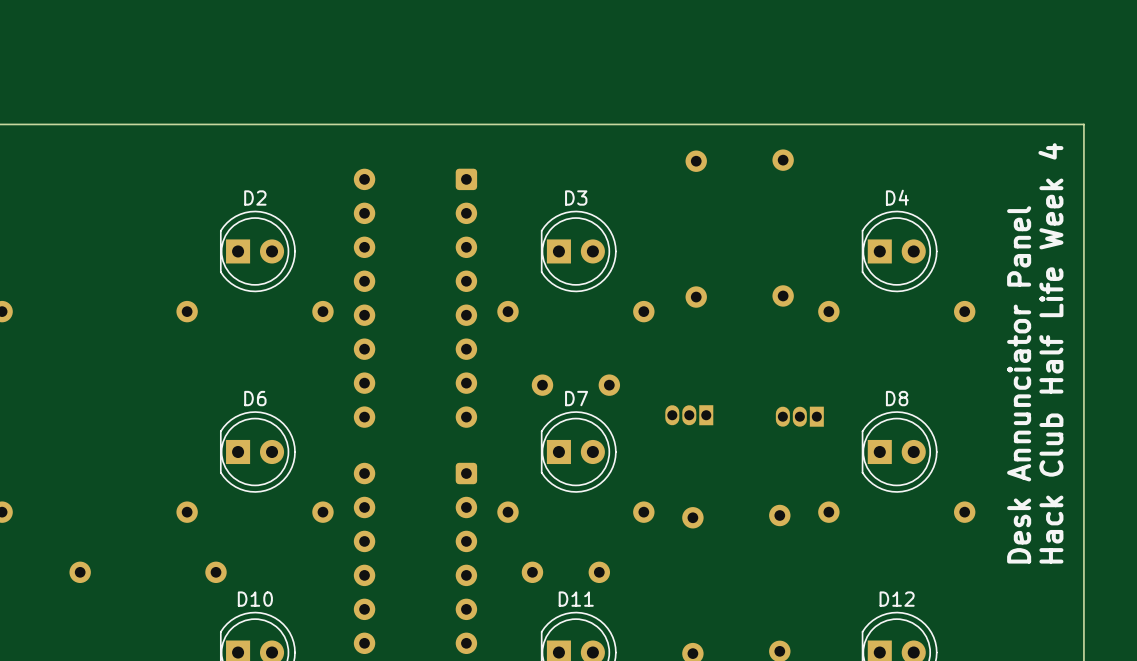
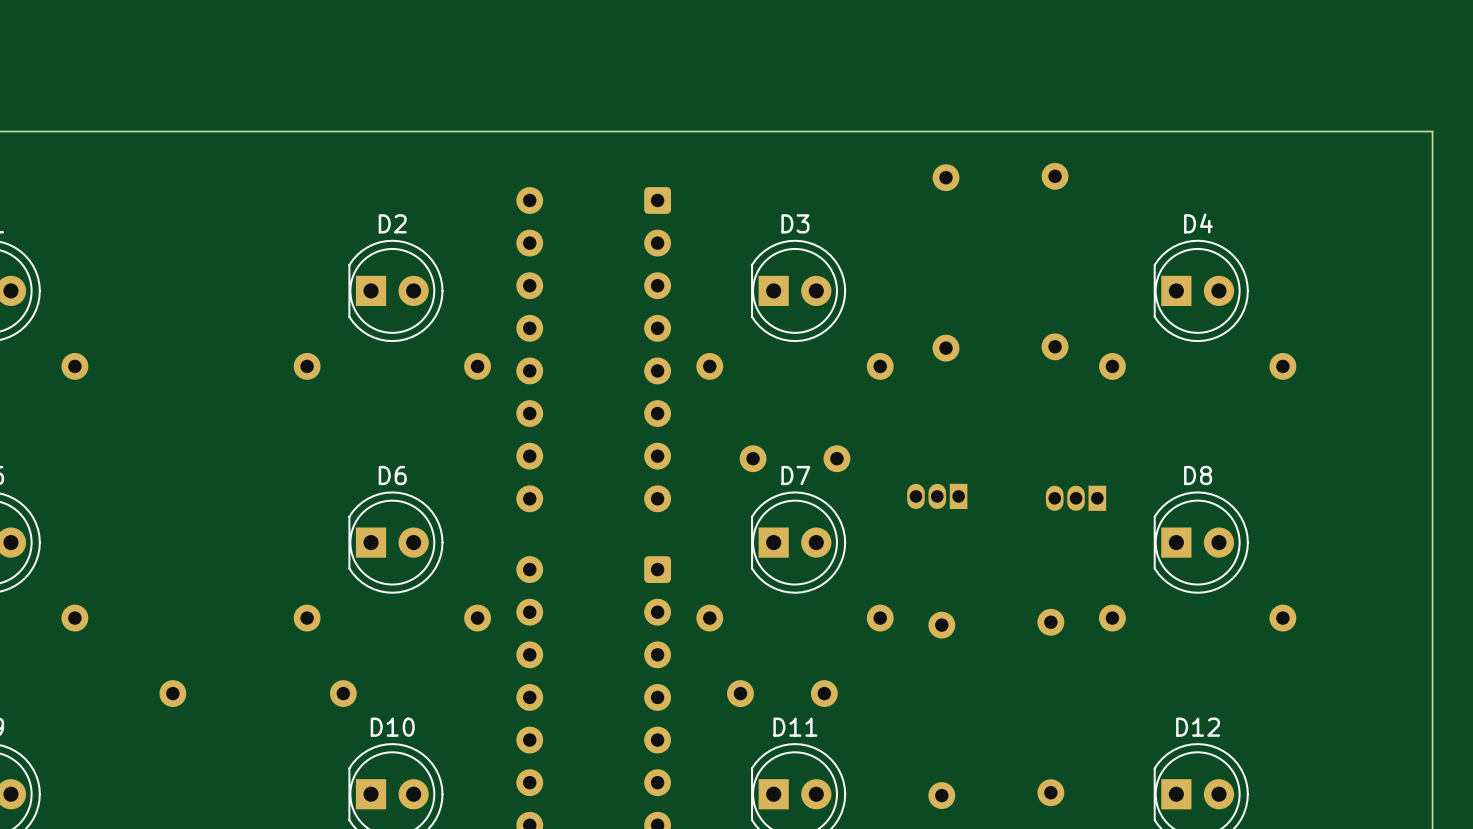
text: Hack Club Half Life Week 4 (1050, 353) -> none
text: Desk Annunciator Panel (1019, 384) -> none

